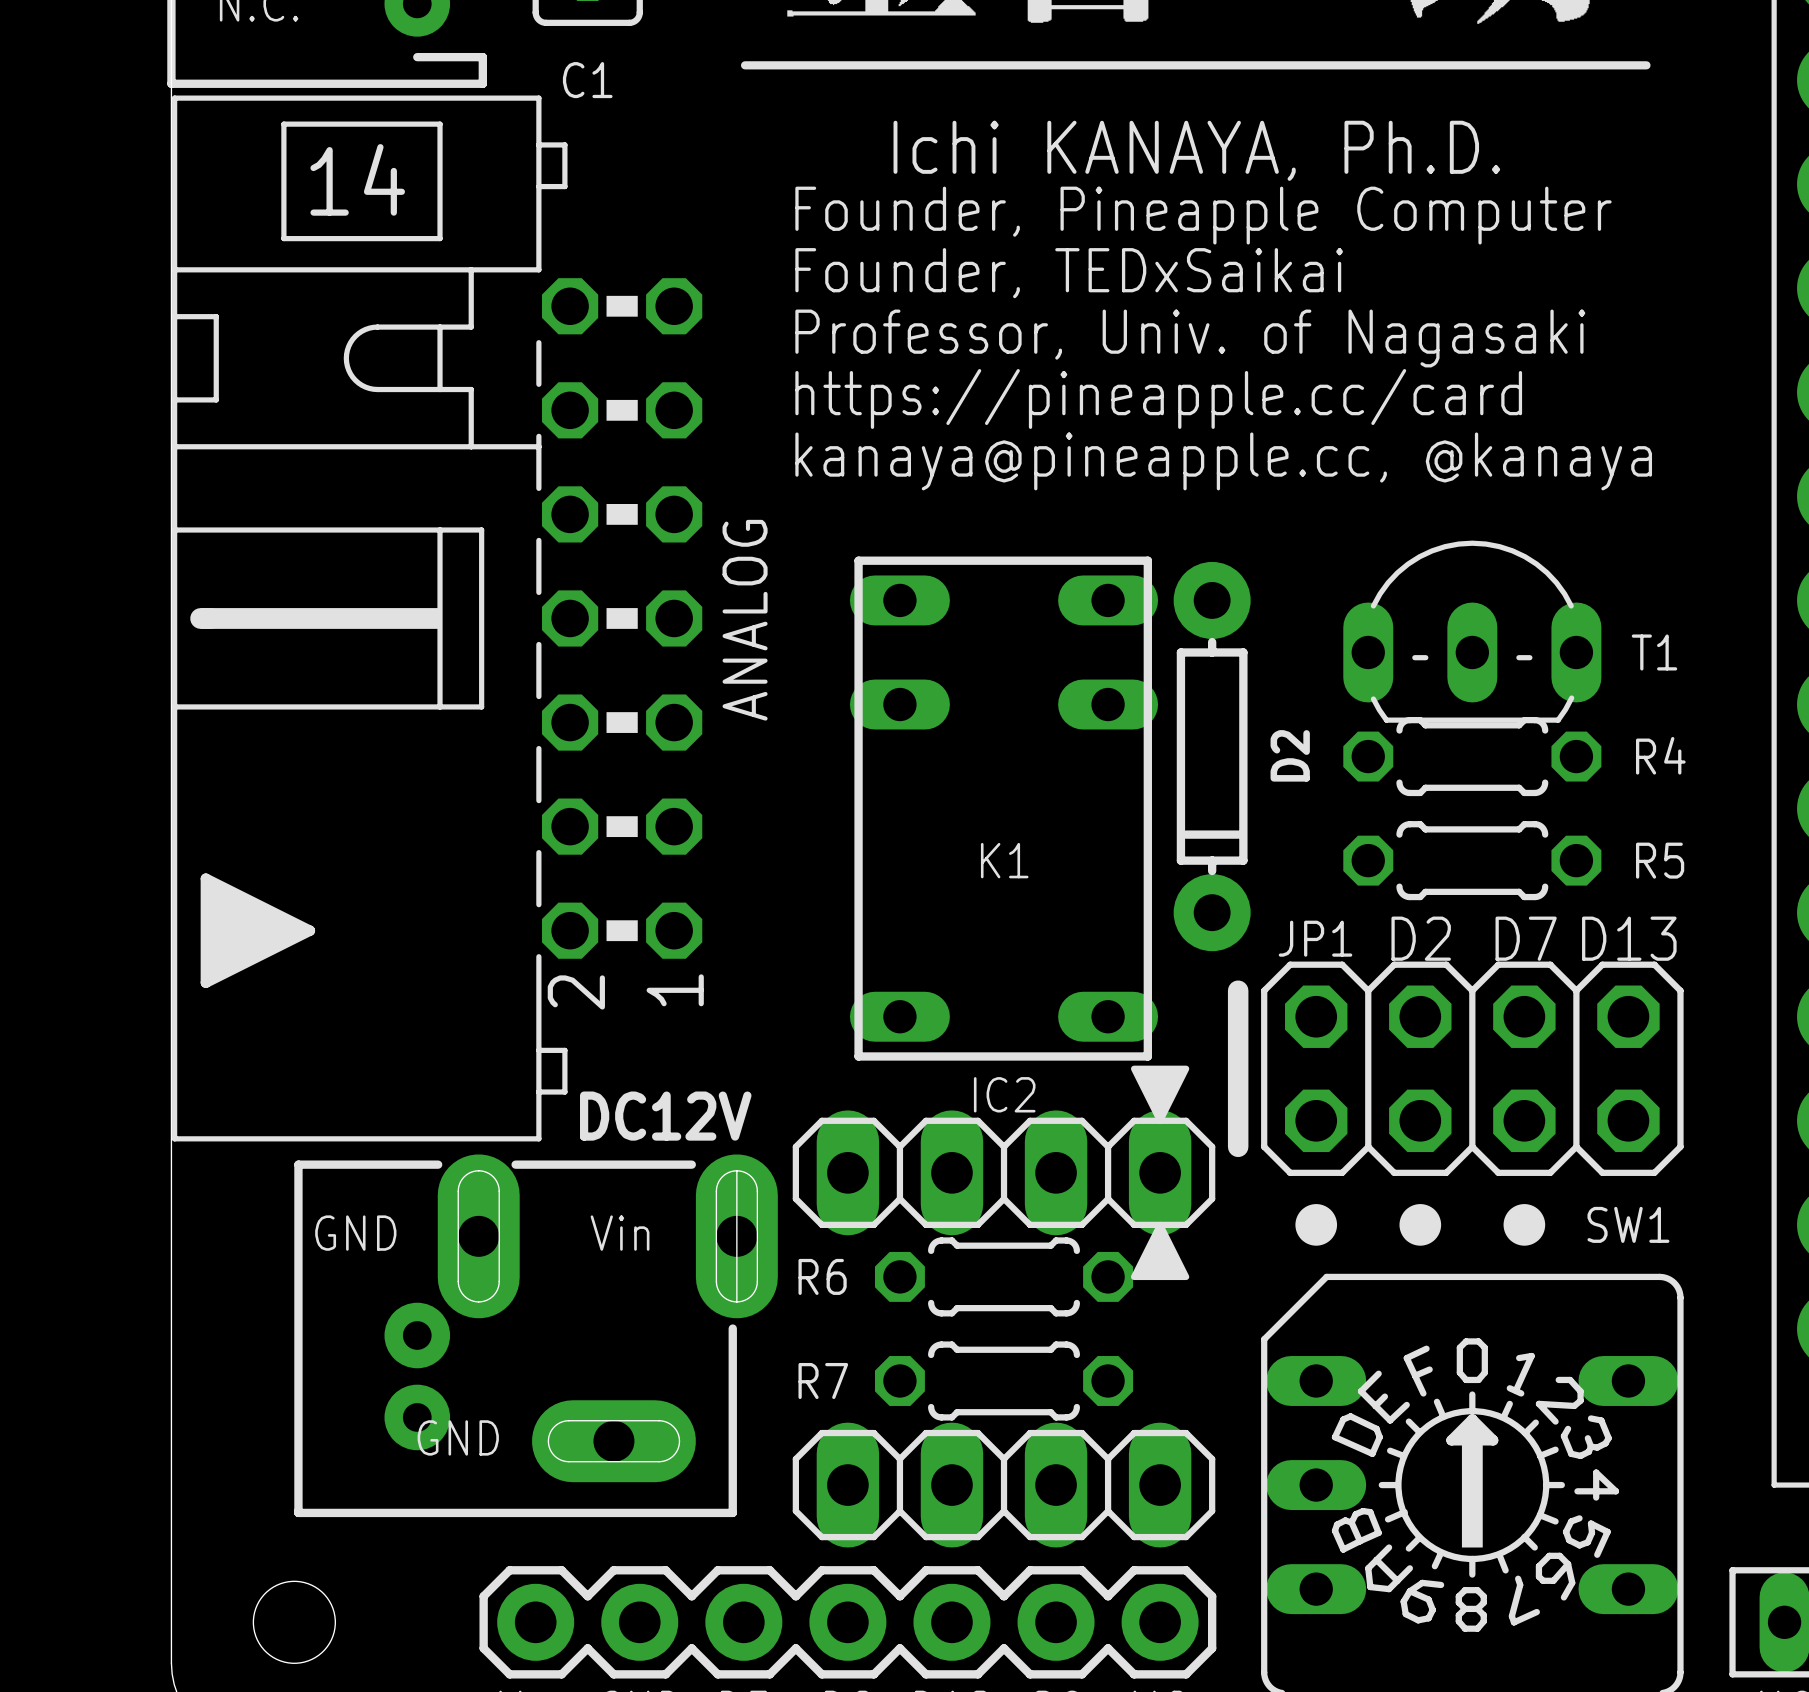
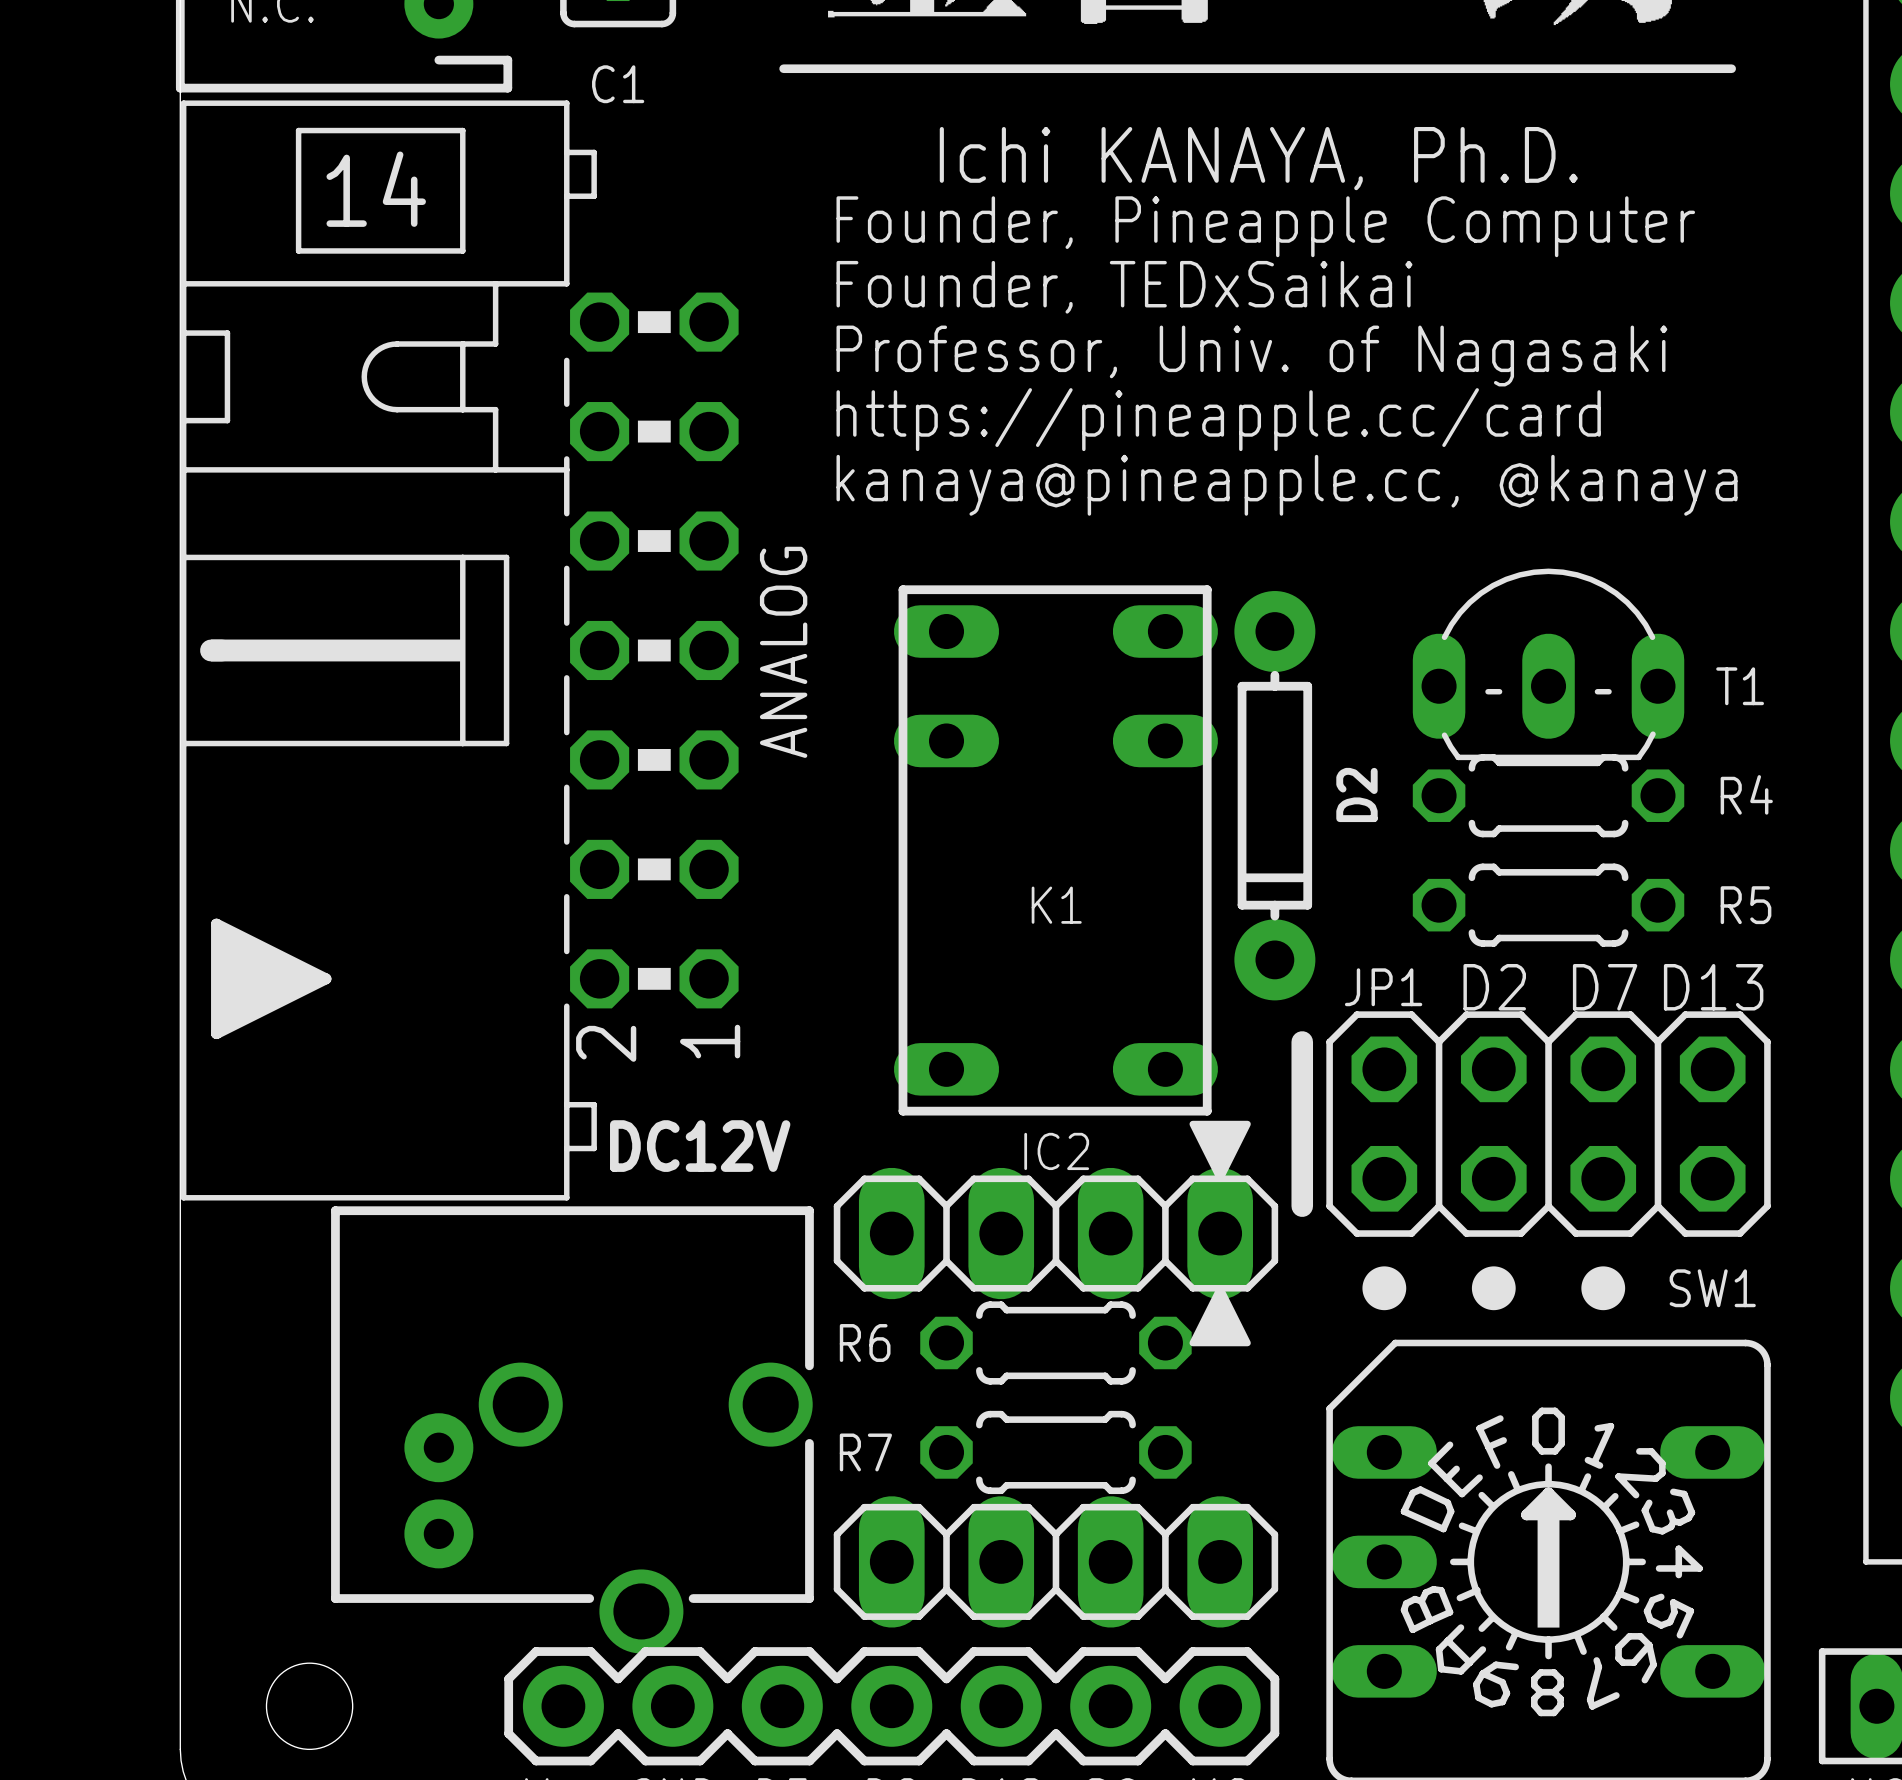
DC12V footprint: [294, 1154, 778, 1518] -> [331, 1206, 814, 1654]
text: GND (355, 1233) -> none
text: Vin (620, 1233) -> none
part position: (417, 1376) -> (438, 1490)
text: GND (458, 1437) -> none

